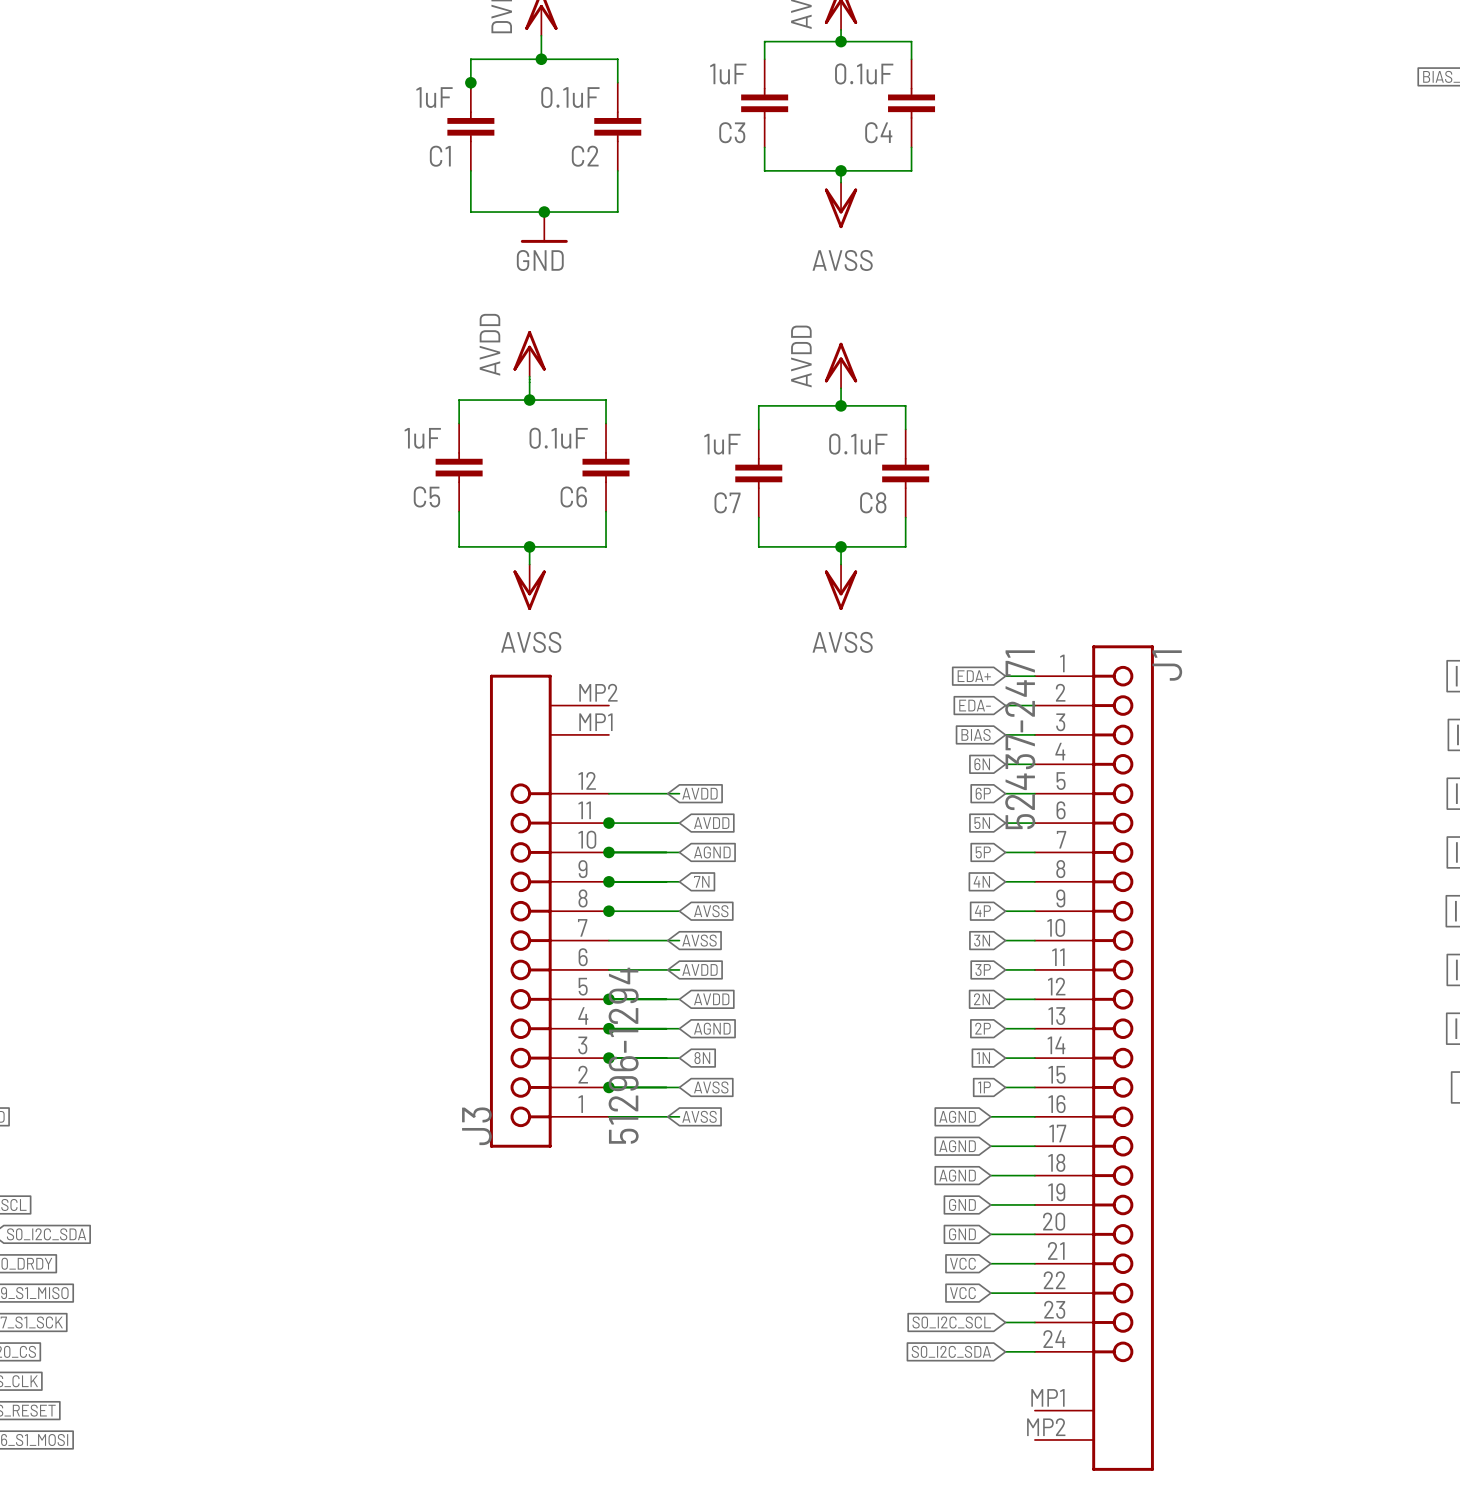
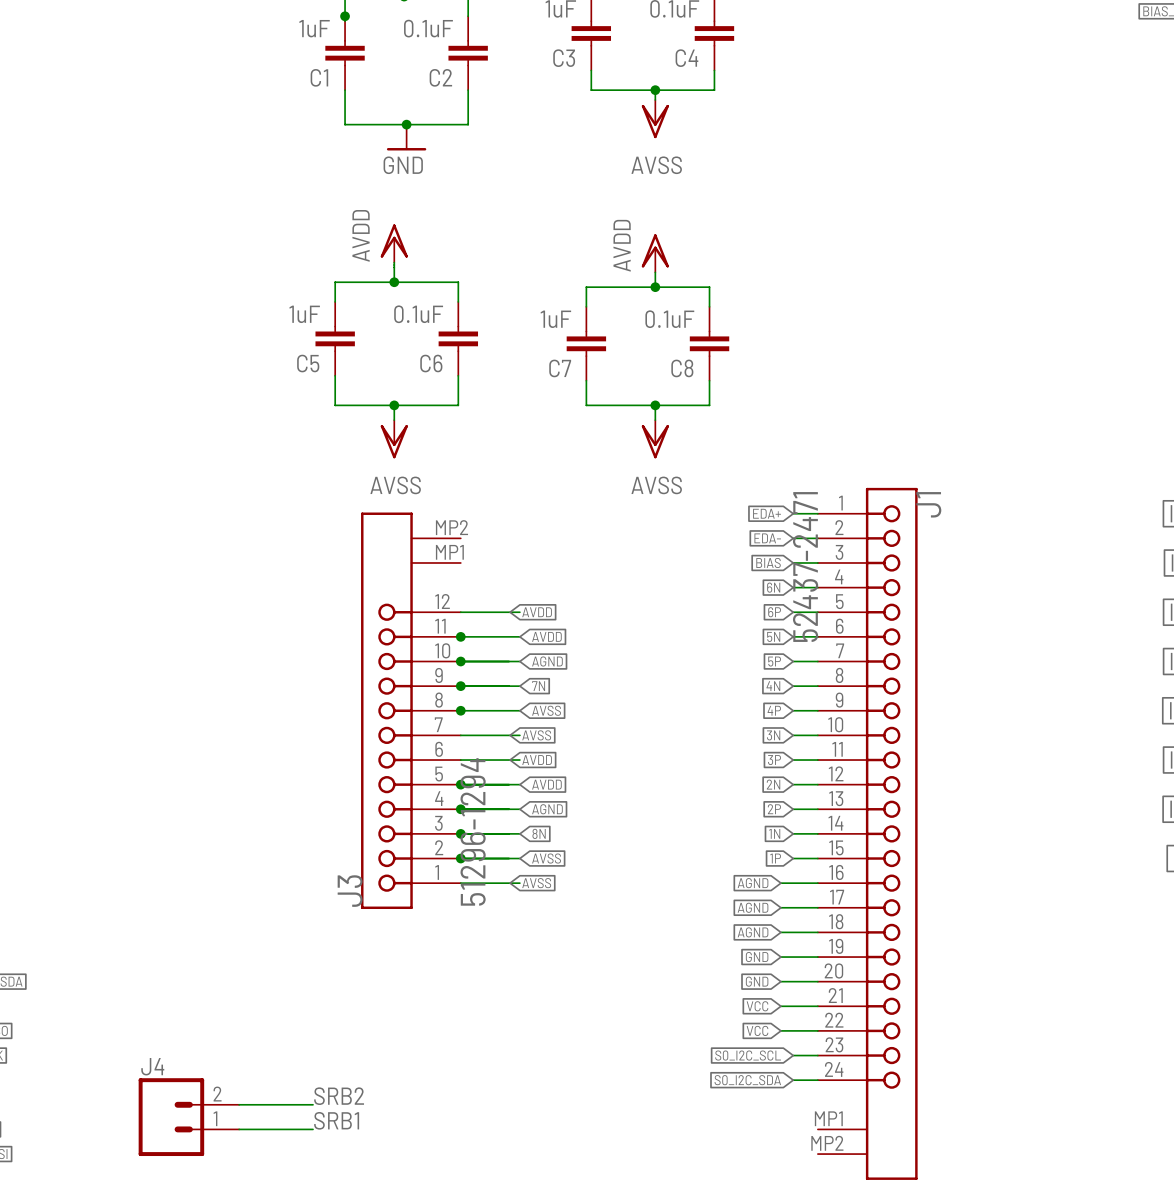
label: none -> SRB2 (339, 1096)
wire: none -> (239, 1104) (313, 1104)
J4: none -> (188, 1117)
label: none -> SRB1 (336, 1120)
wire: none -> (239, 1129) (313, 1129)

